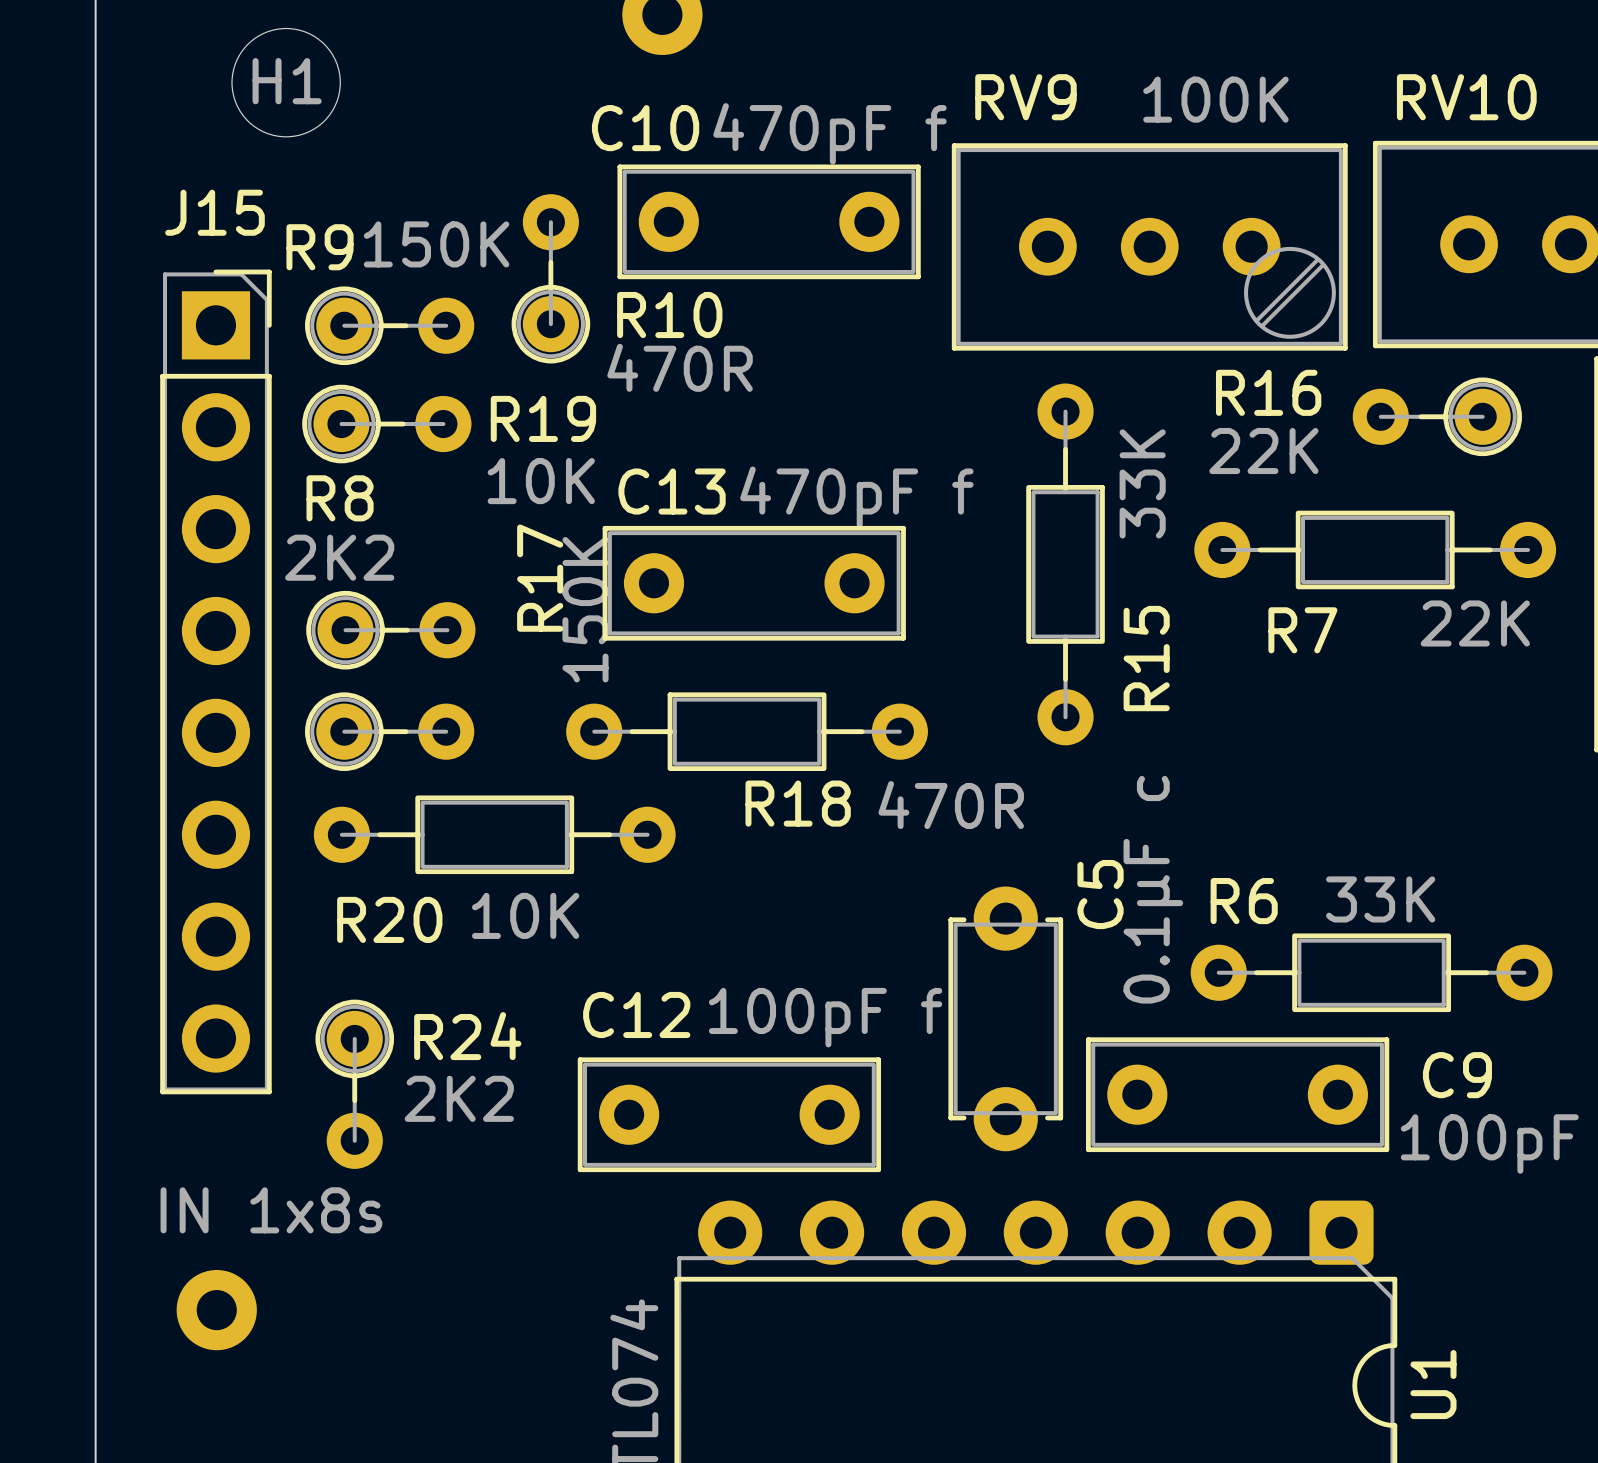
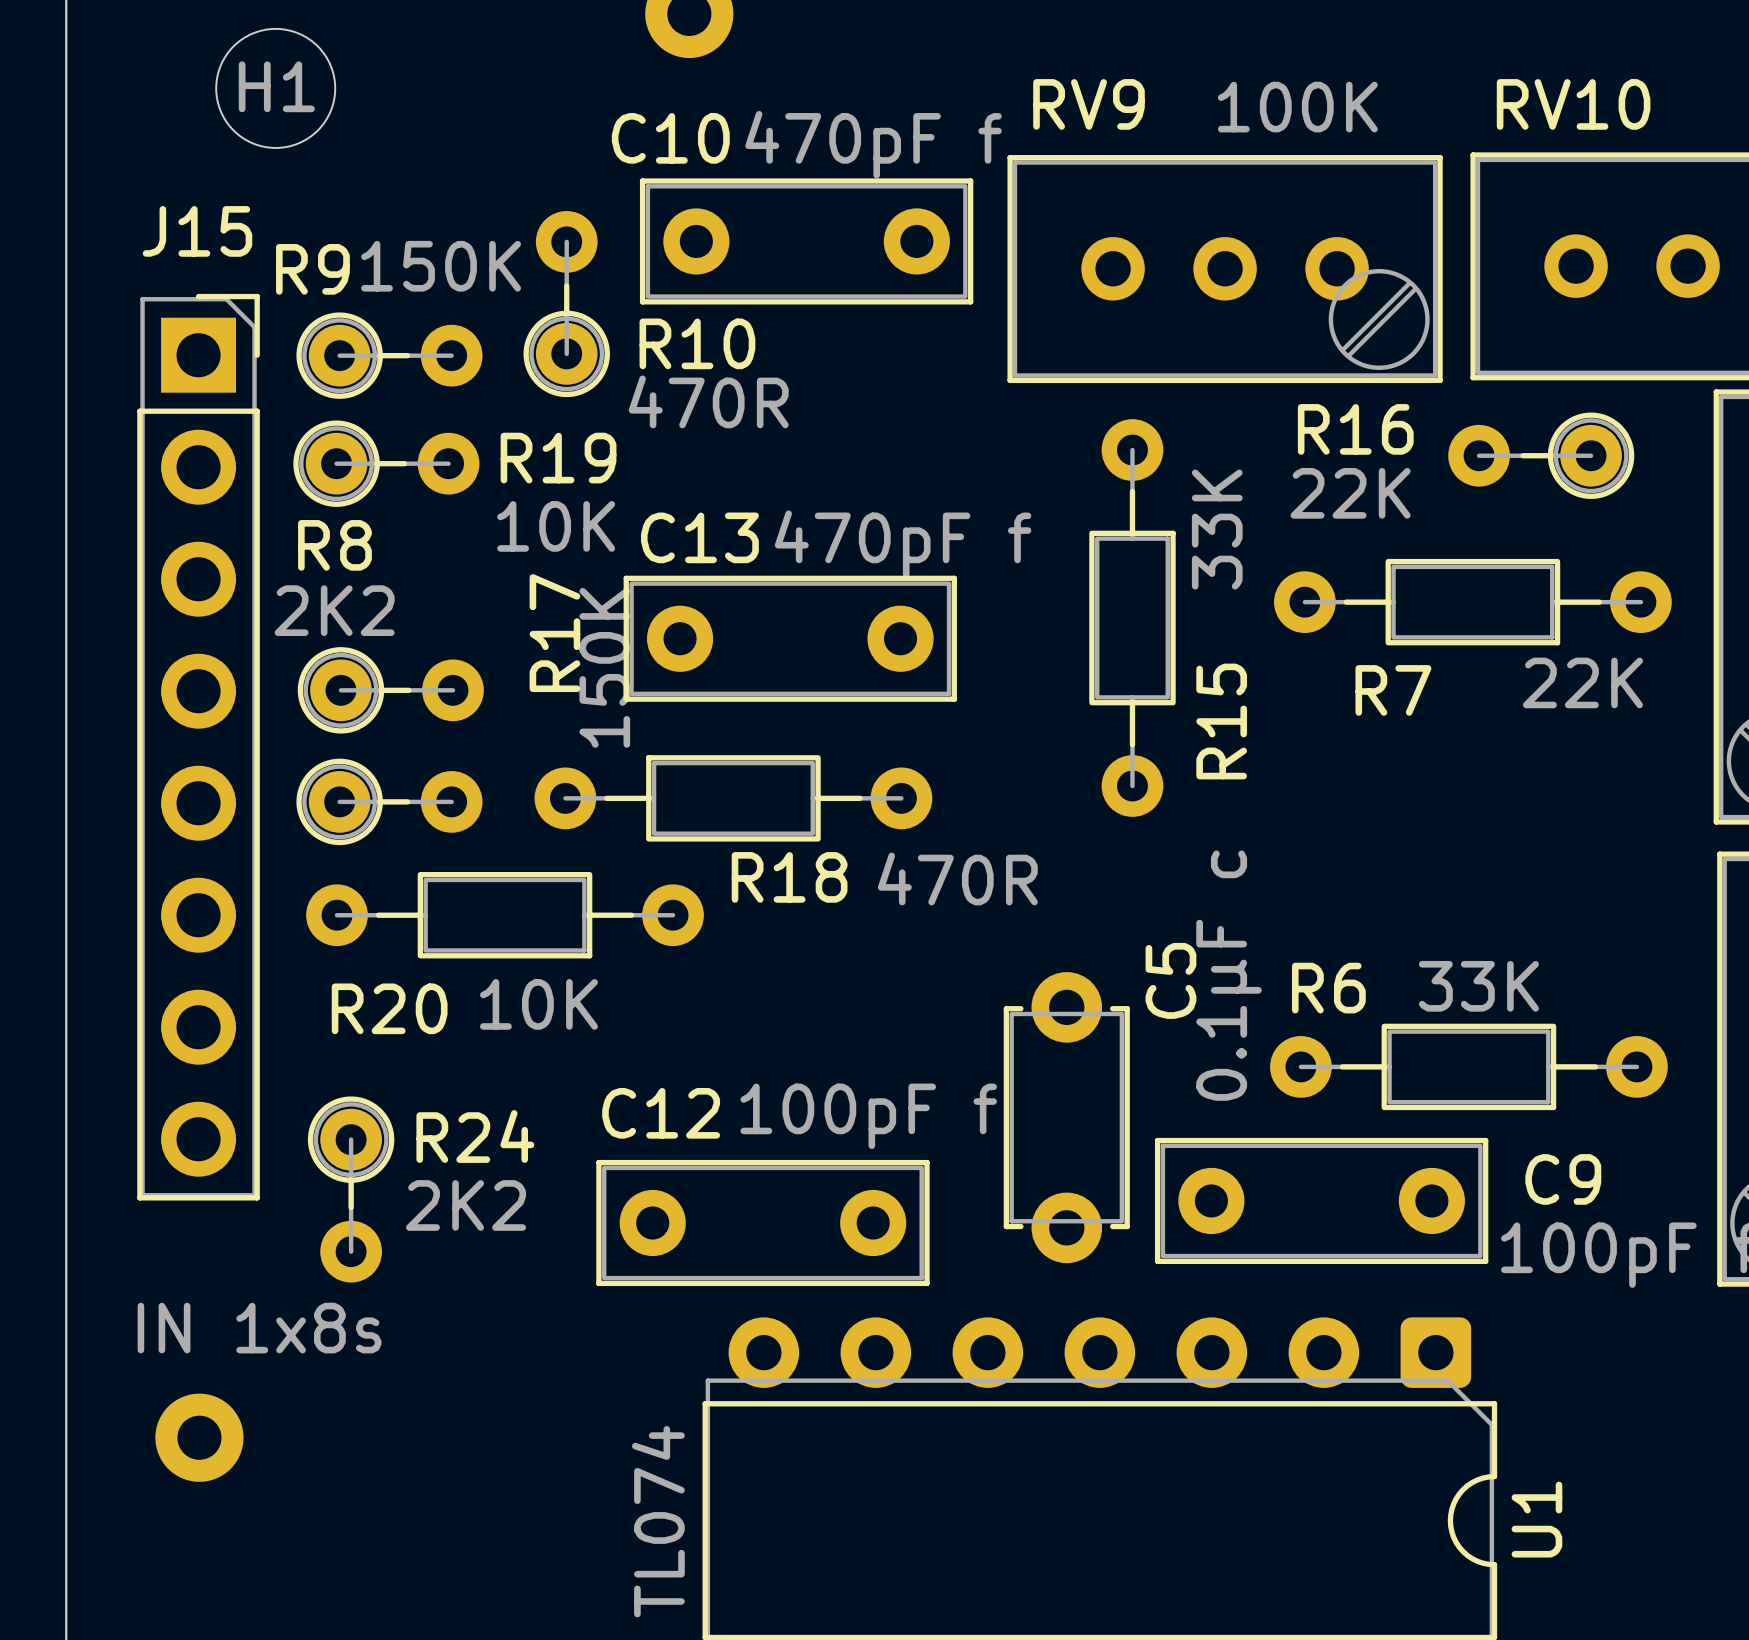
R18 position: (747, 731) -> (733, 798)

